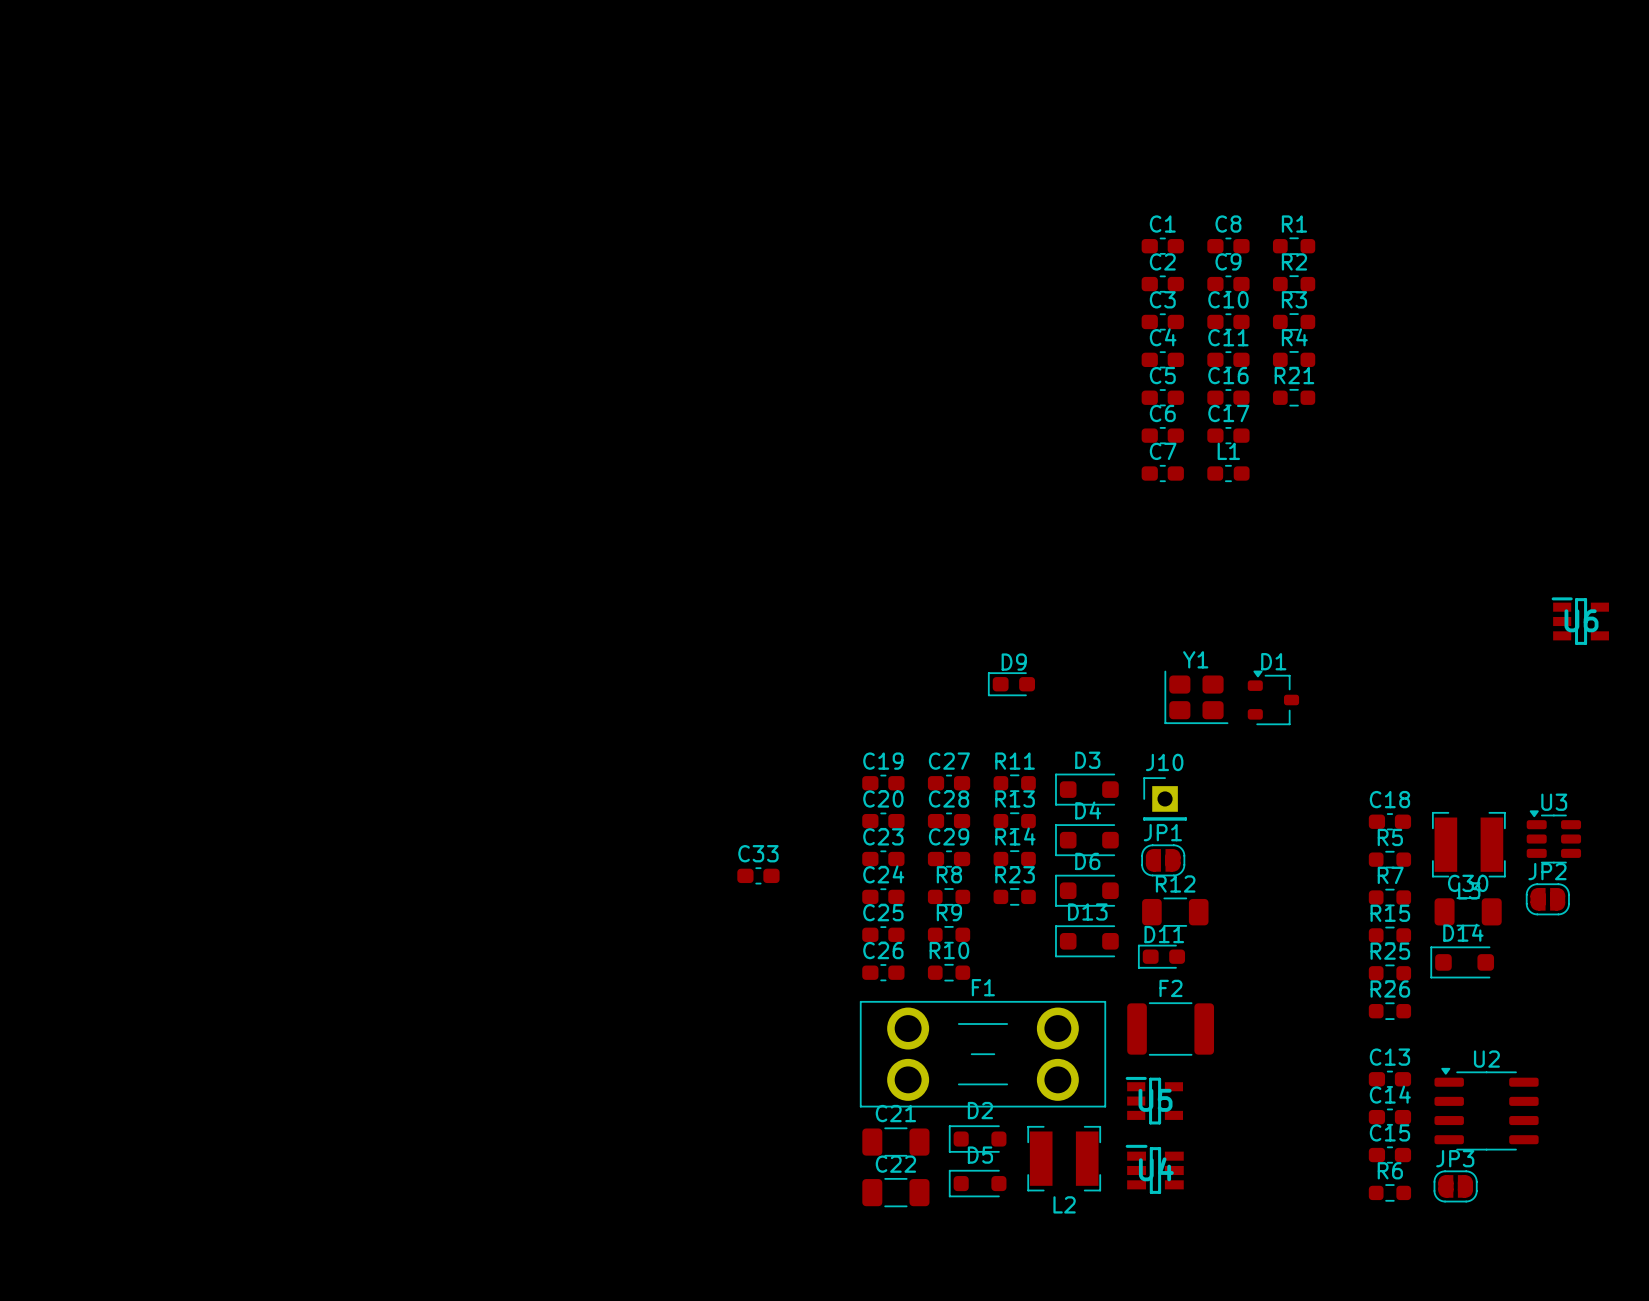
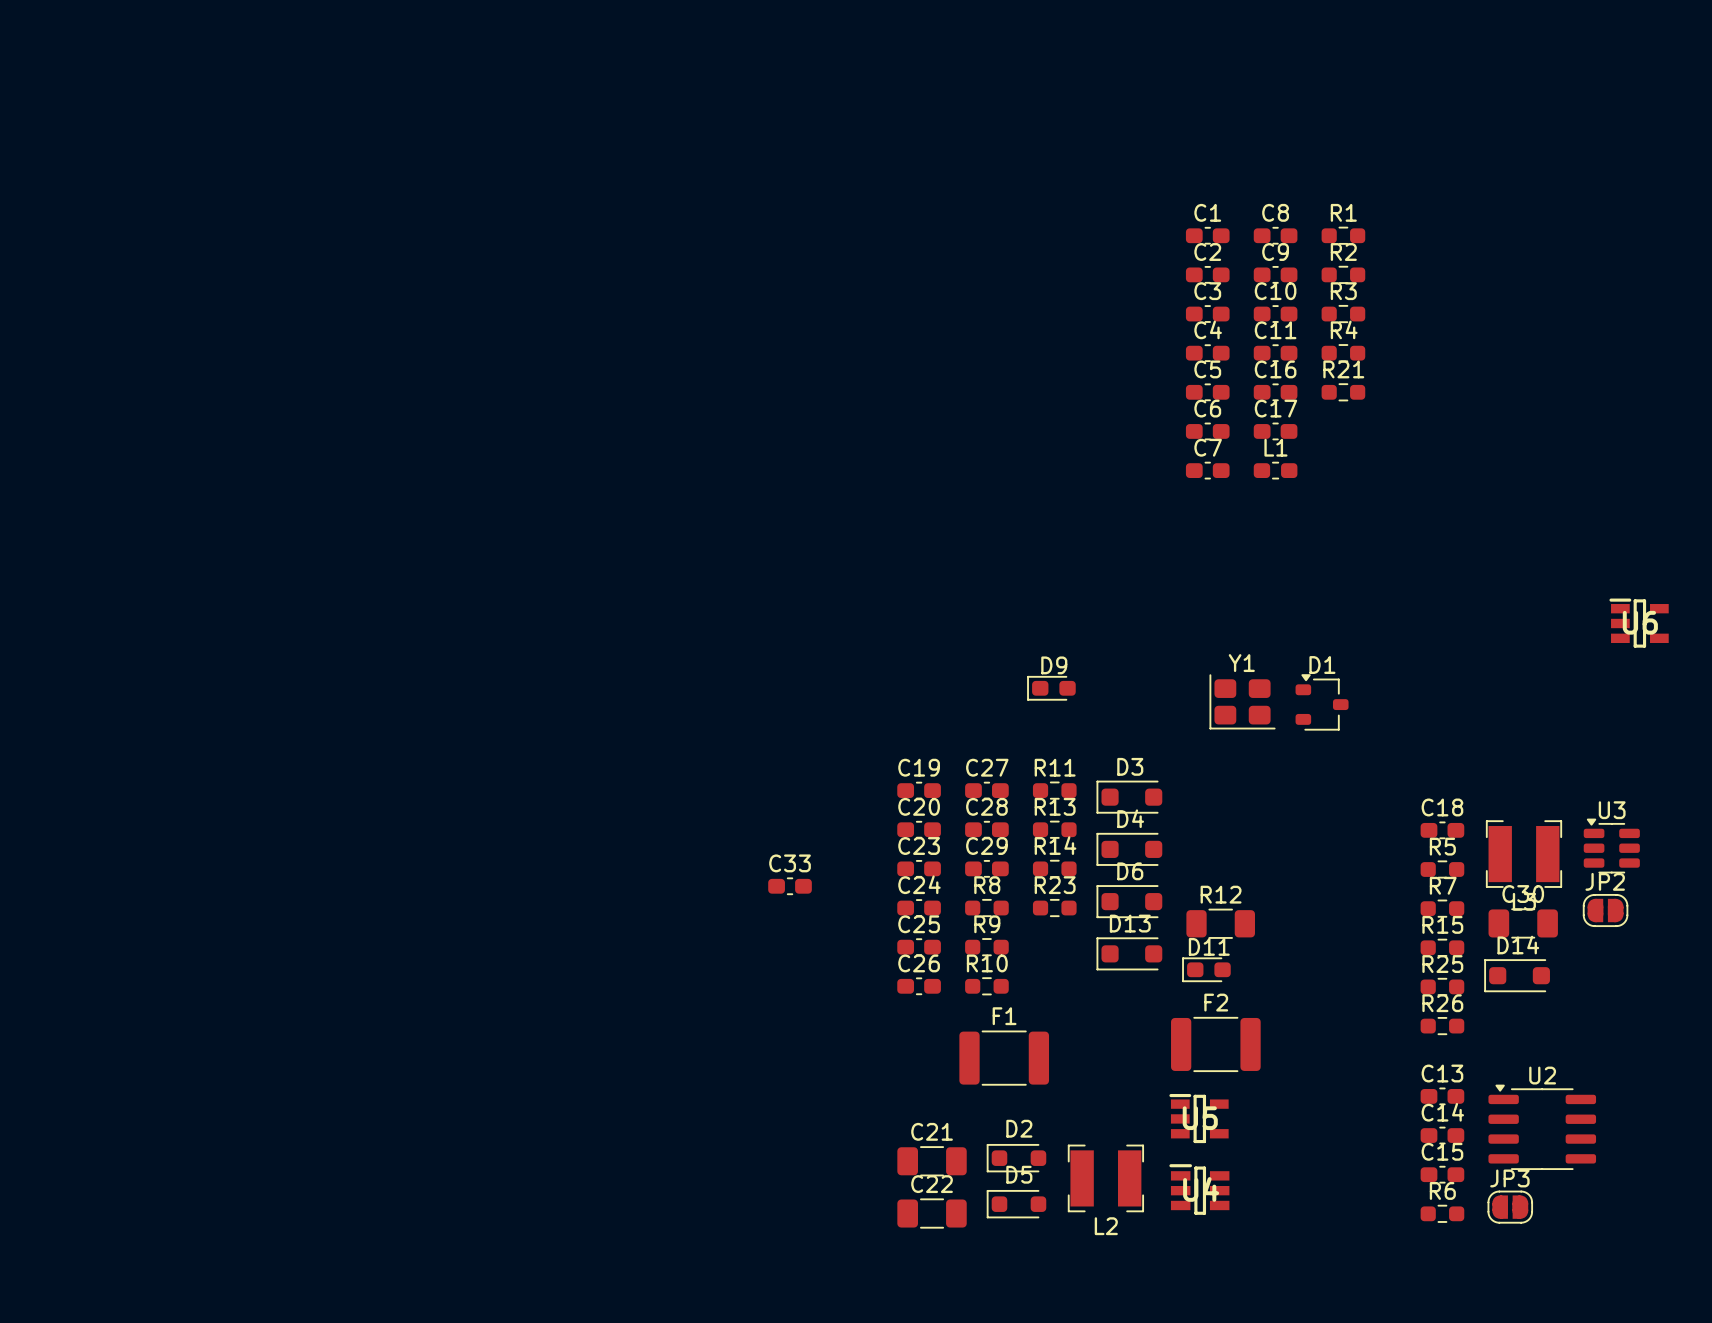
J10: (1165, 798) -> none
JP1: (1163, 860) -> none
F1 footprint: [859, 1000, 1107, 1108] -> [959, 1030, 1050, 1086]

